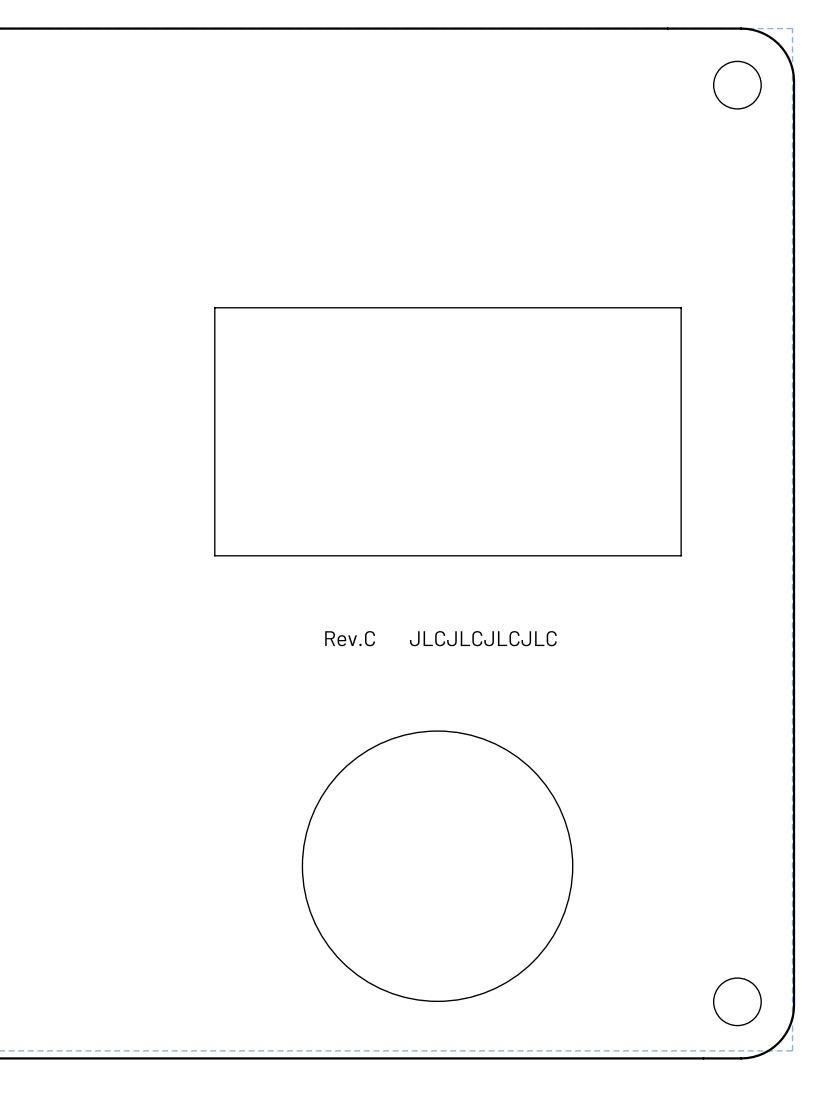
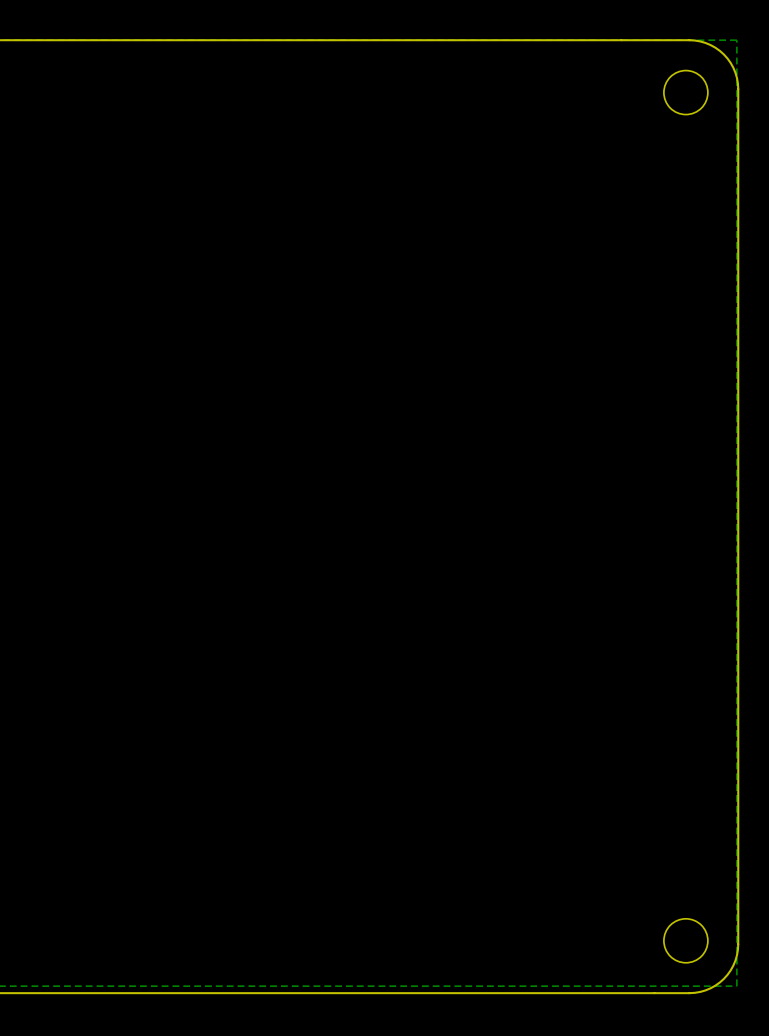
board edge: (681, 307) (214, 307) (214, 555) (681, 555) (681, 307) -> none
text: Rev.C (350, 638) -> none
text: JLCJLCJLCJLC (483, 638) -> none
round board edge: [302, 730, 574, 1002] -> none

